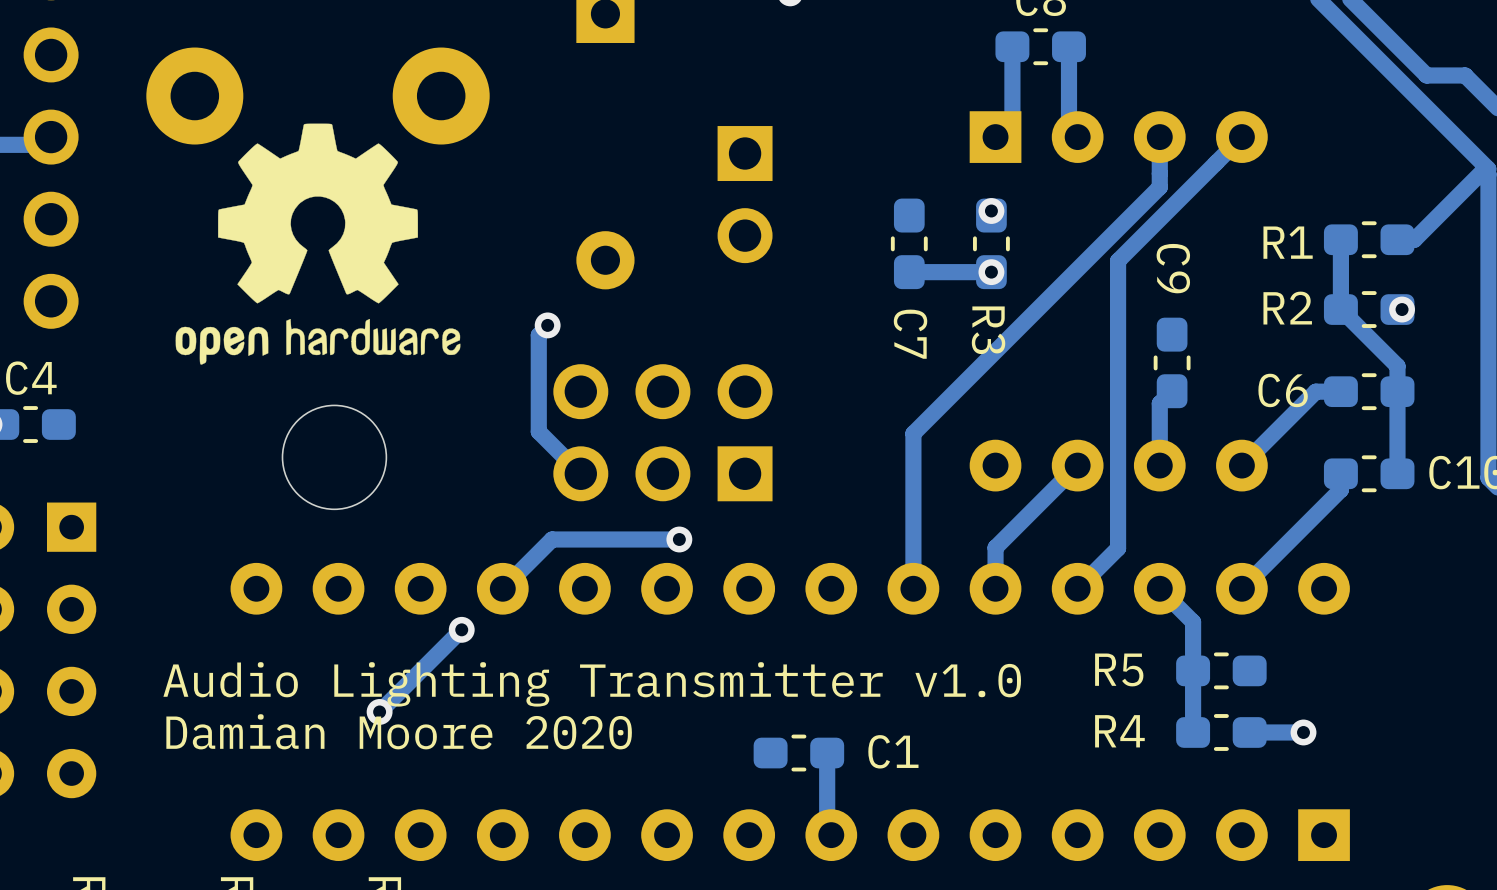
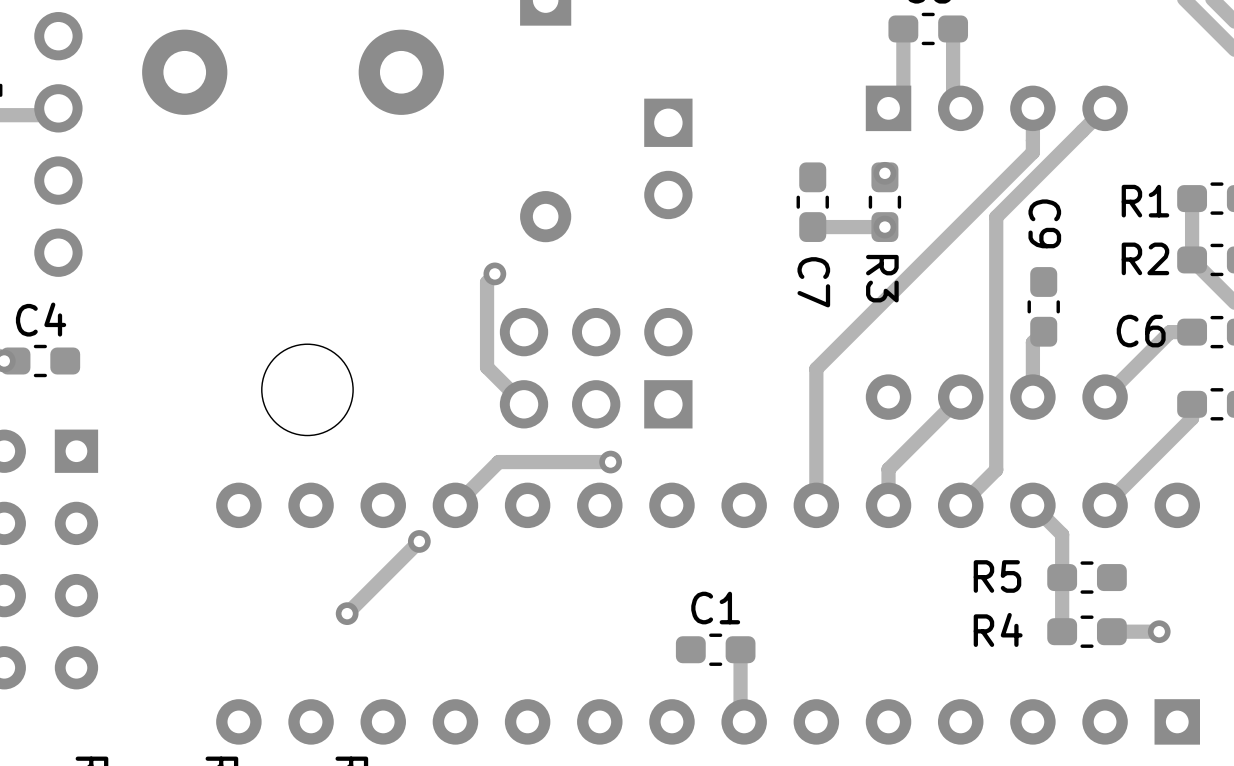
drawing: [175, 123, 461, 365] -> none
text: Audio Lighting Transmitter v1.0 (592, 684) -> none
text: Damian Moore 2020 (399, 731) -> none
C1 name position: C1 (893, 751) -> C1 (715, 608)

